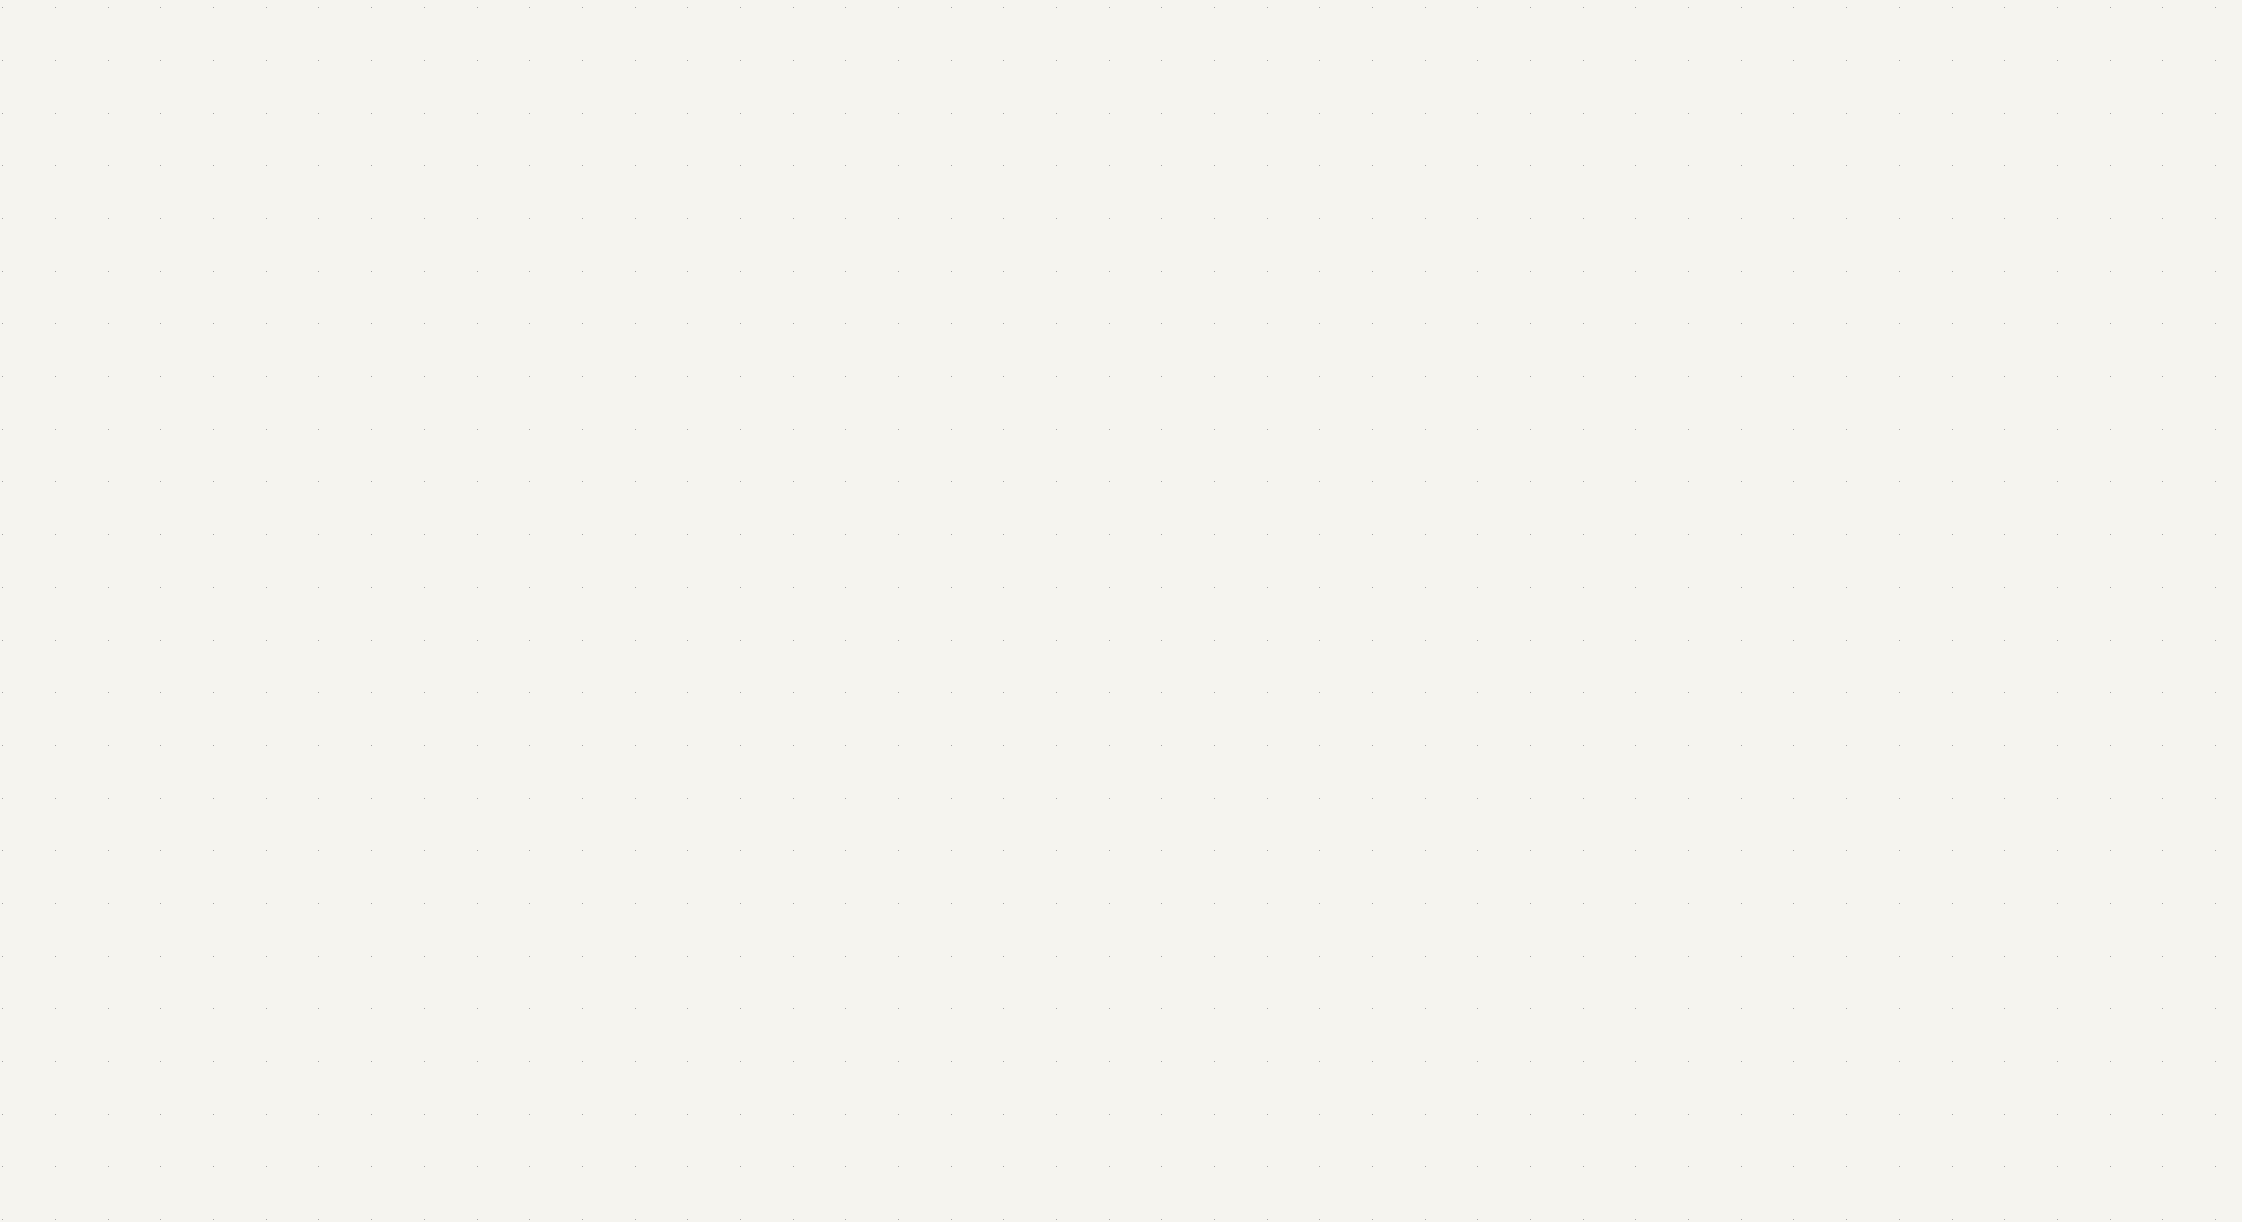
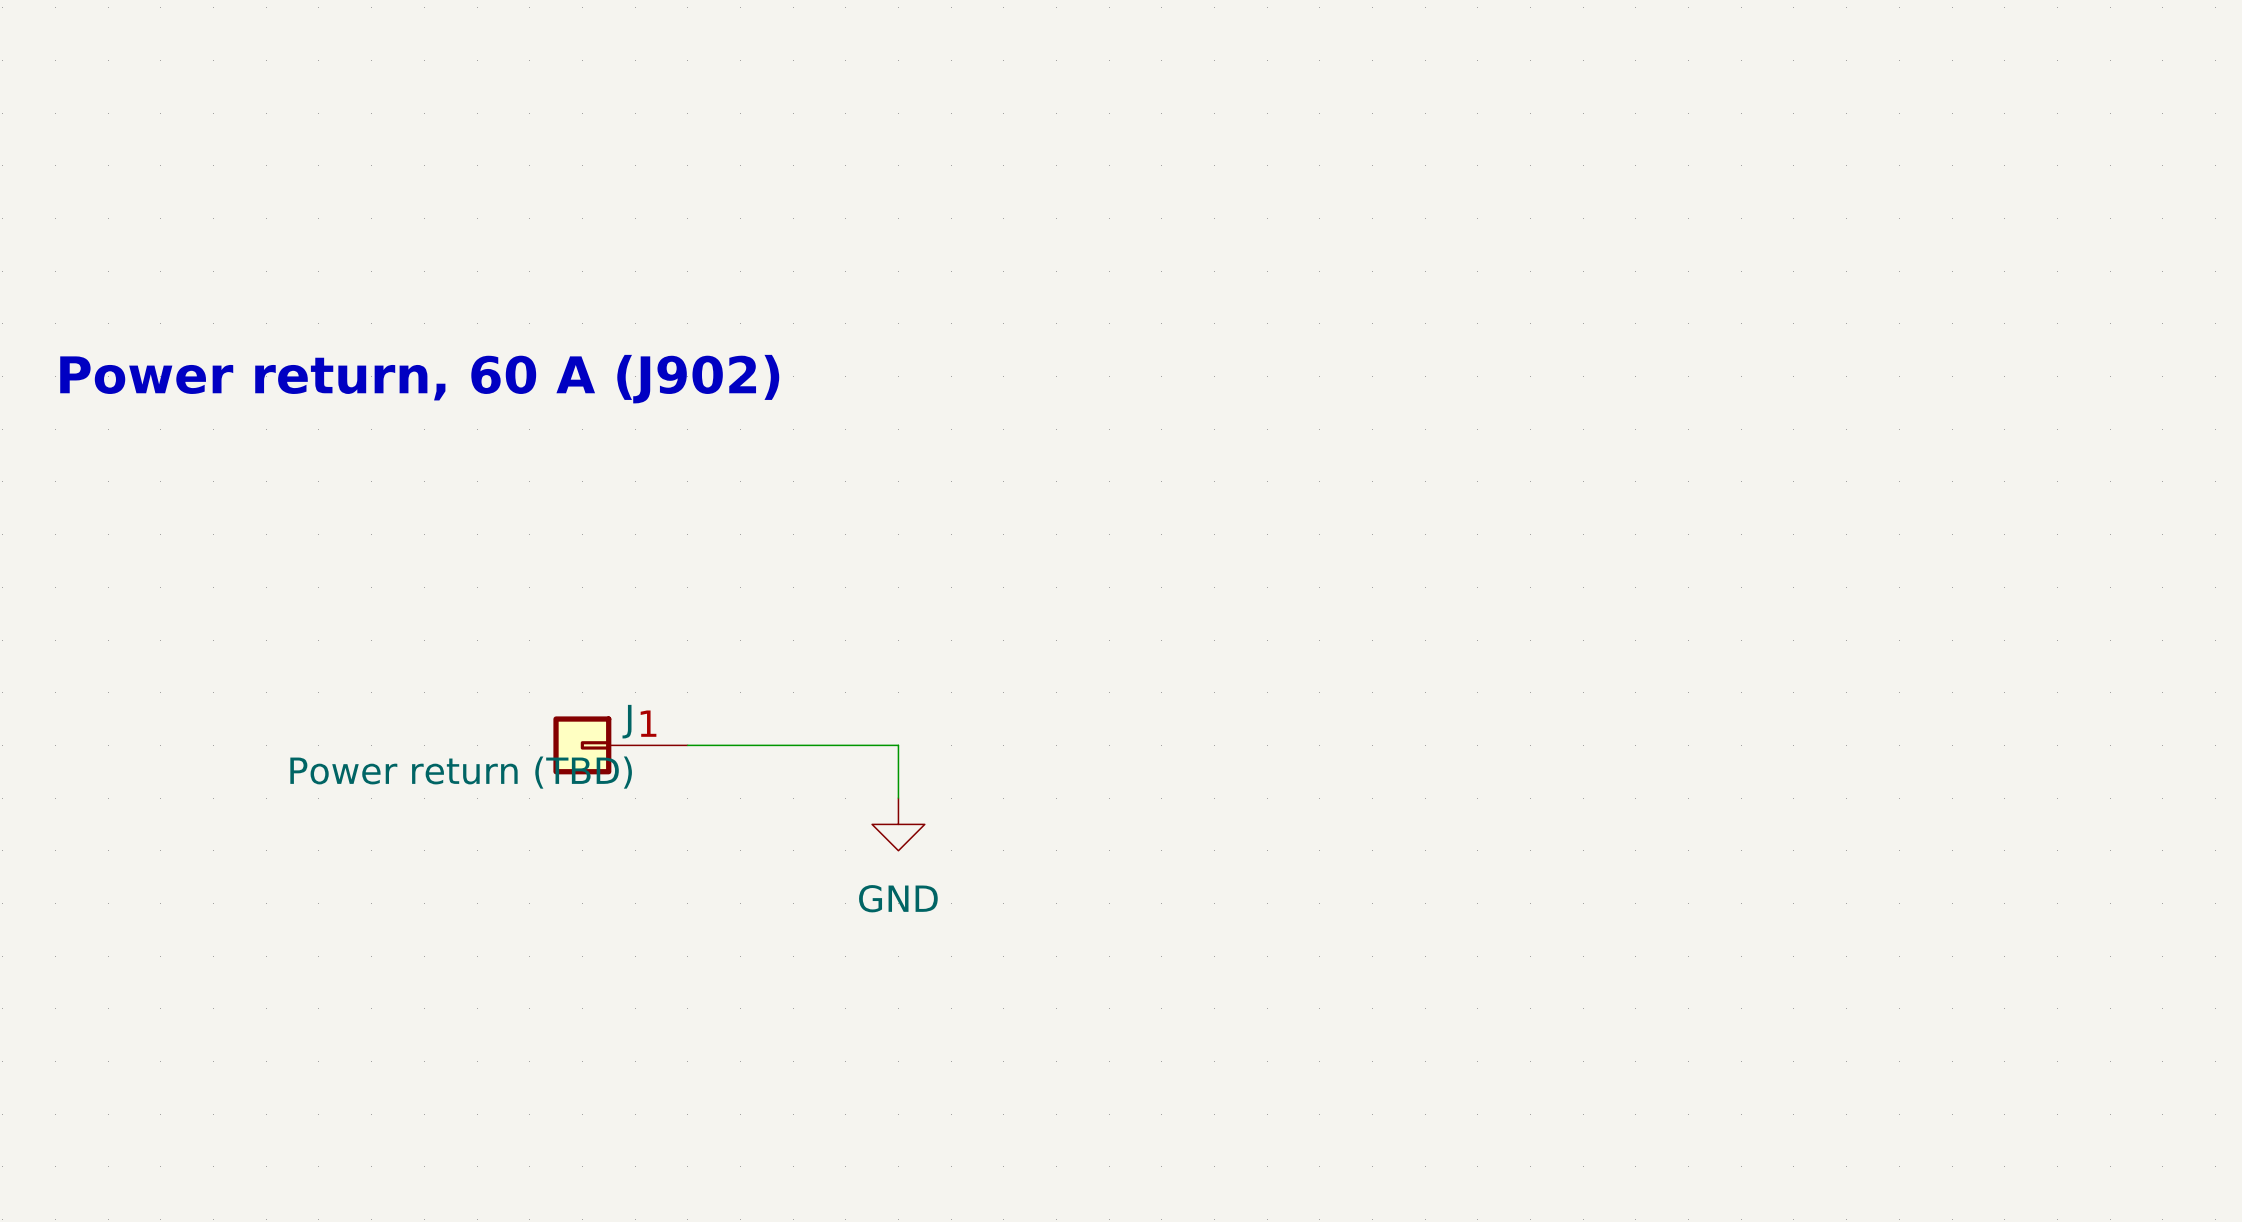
text: none -> Power return, 60 A (J902) (419, 379)
J: none -> Power return (TBD) (620, 745)
wire: none -> (687, 745) (898, 745) (898, 798)
power symbol: none -> GND (898, 824)

